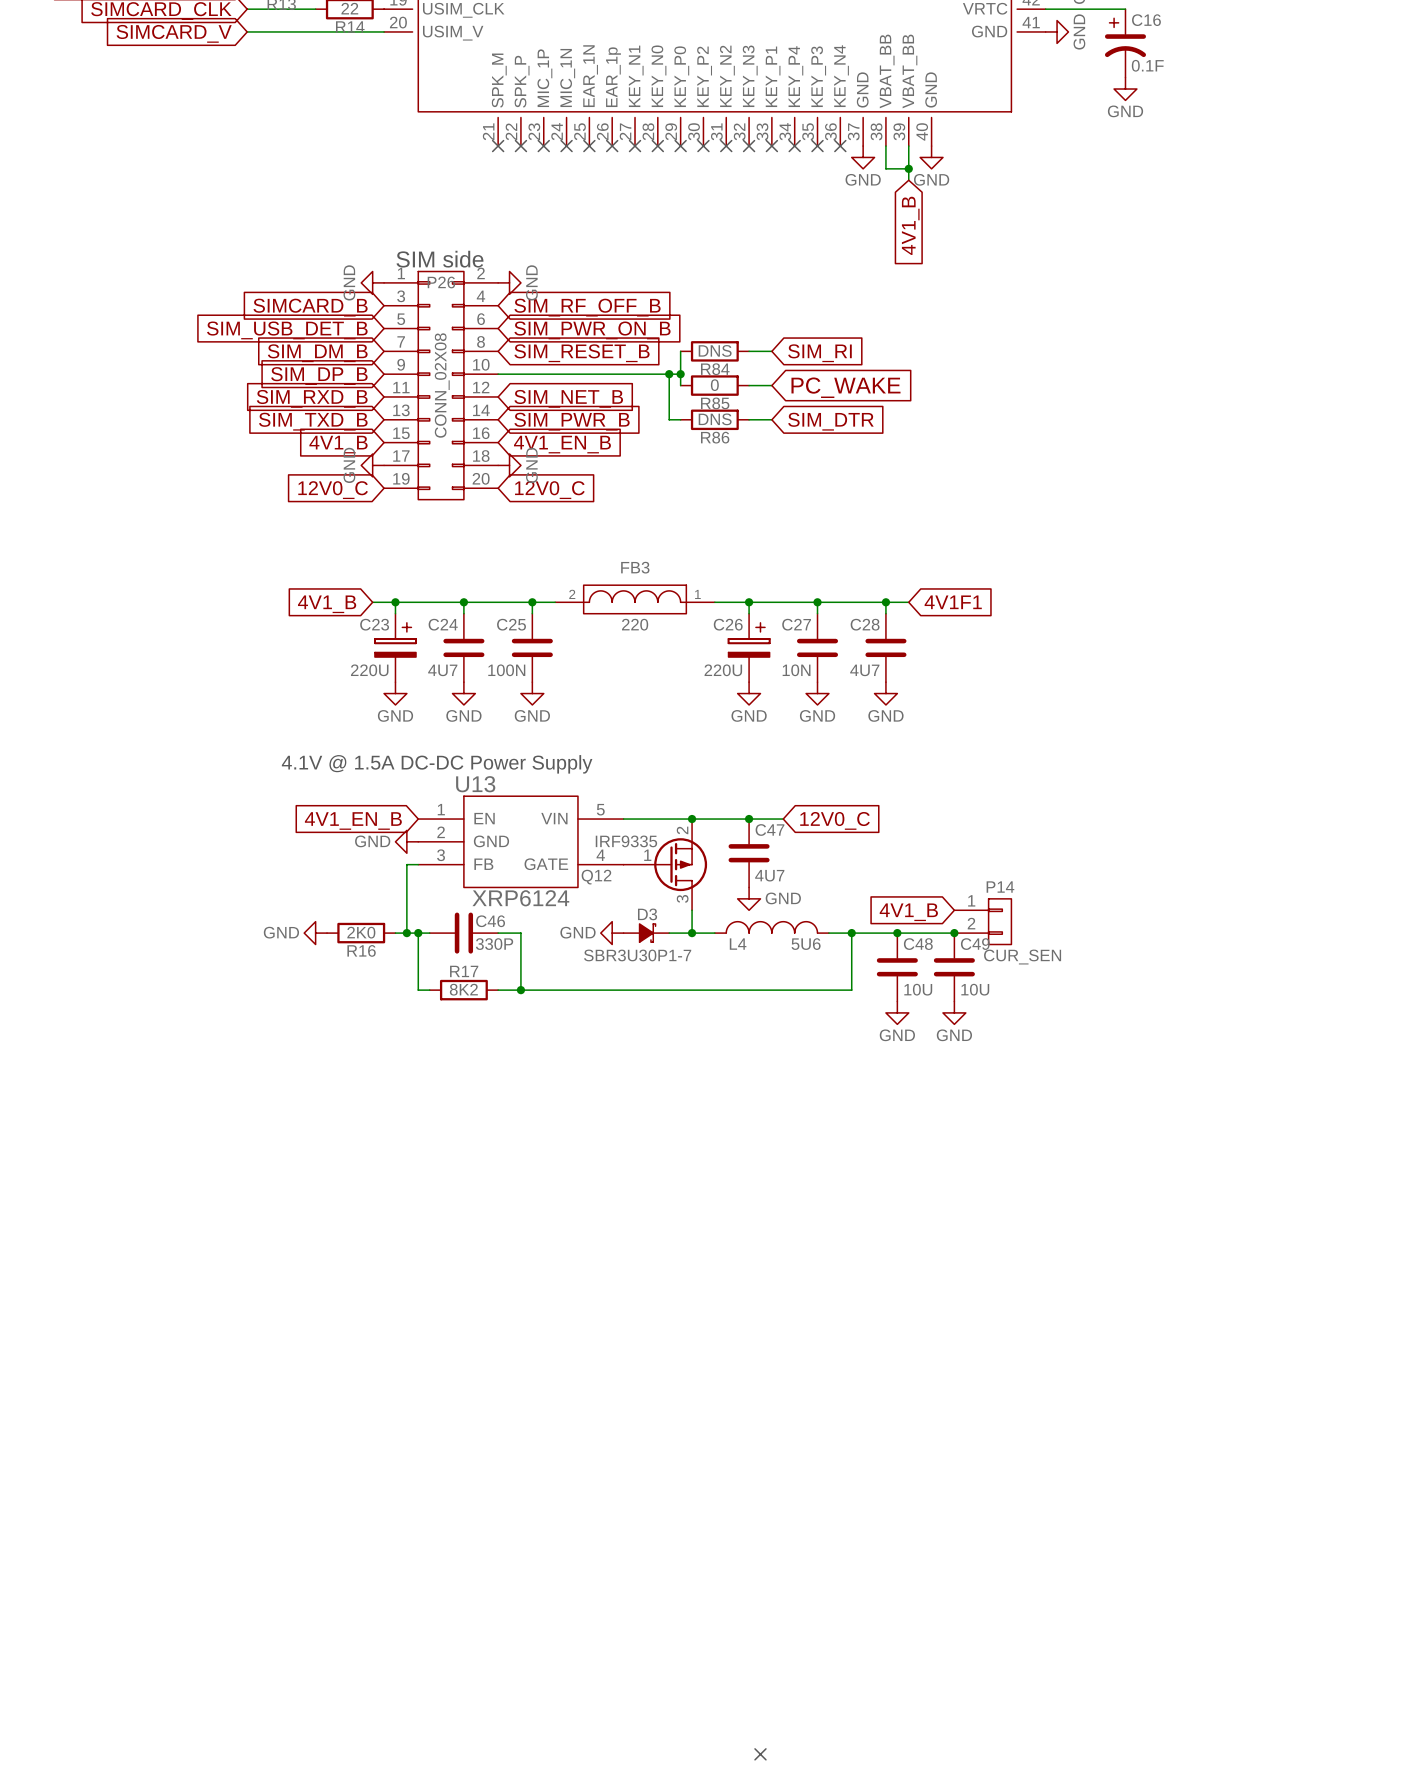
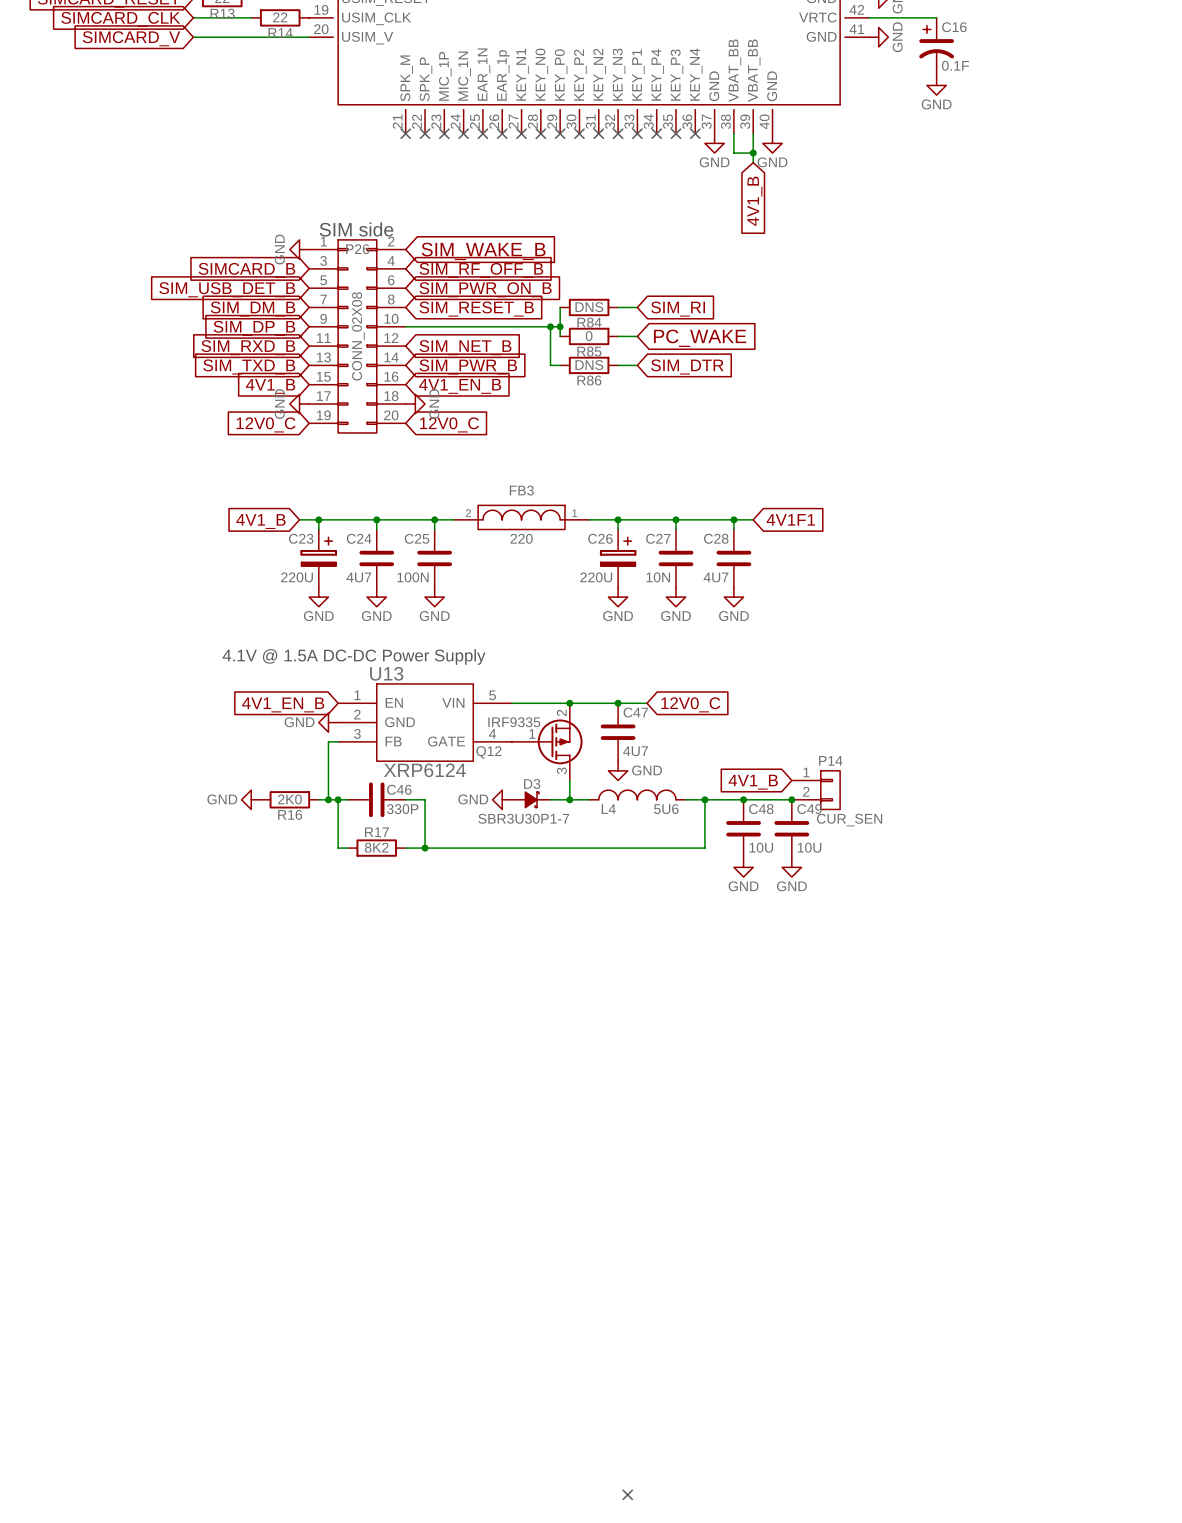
power symbol: GND (509, 282) -> none
global label: none -> SIM_WAKE_B (483, 251)

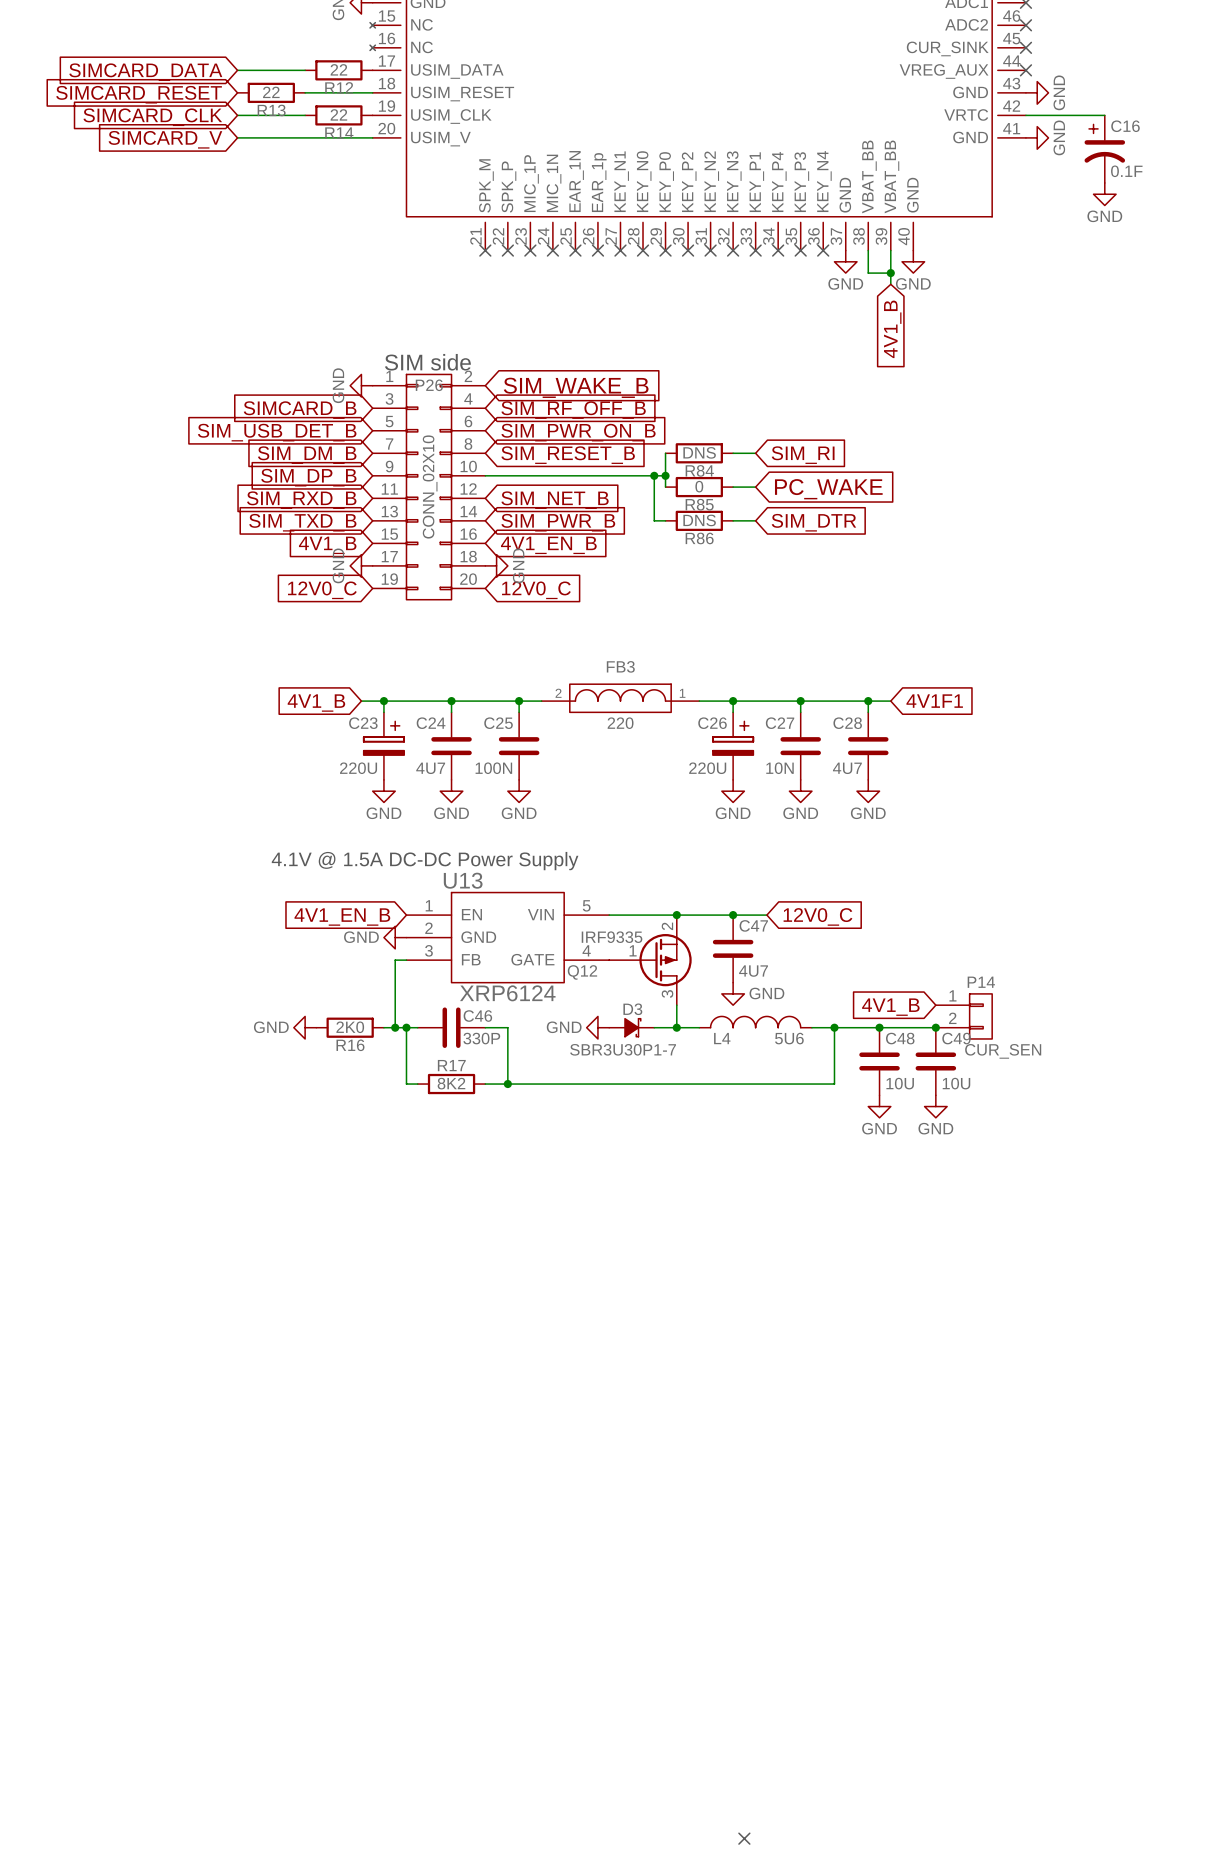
P26 value: CONN_02X08 (358, 336) -> CONN_02X10 (430, 486)

